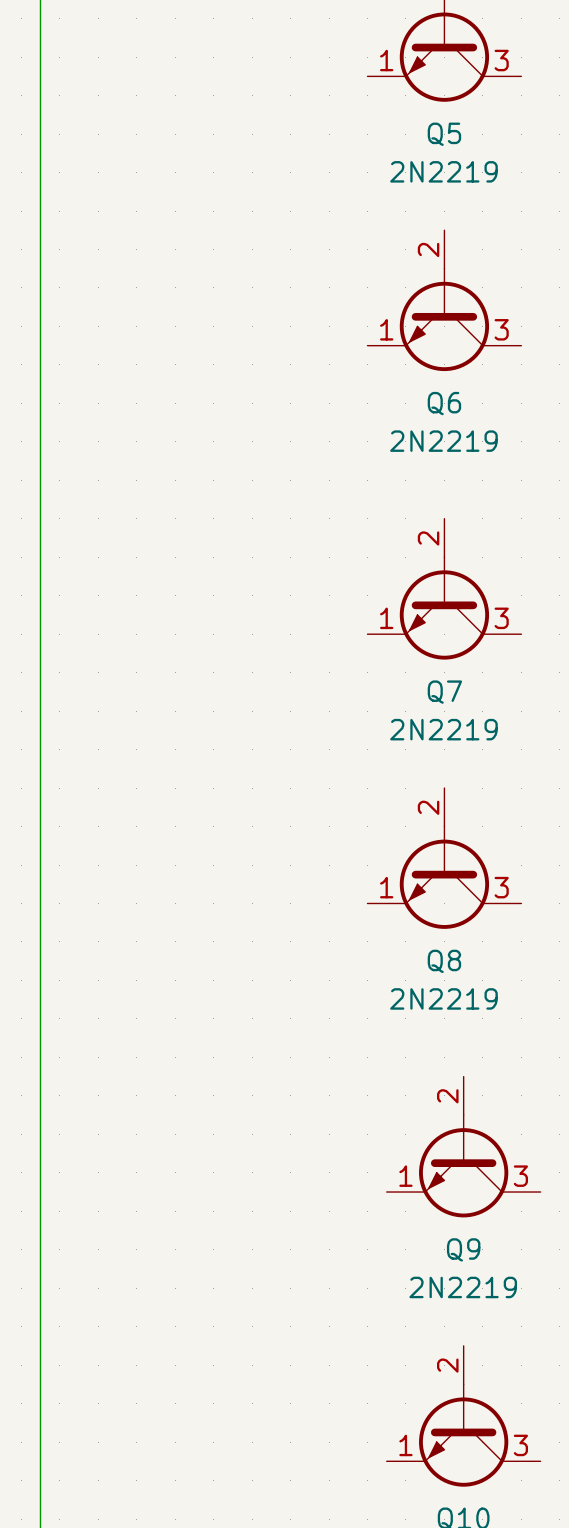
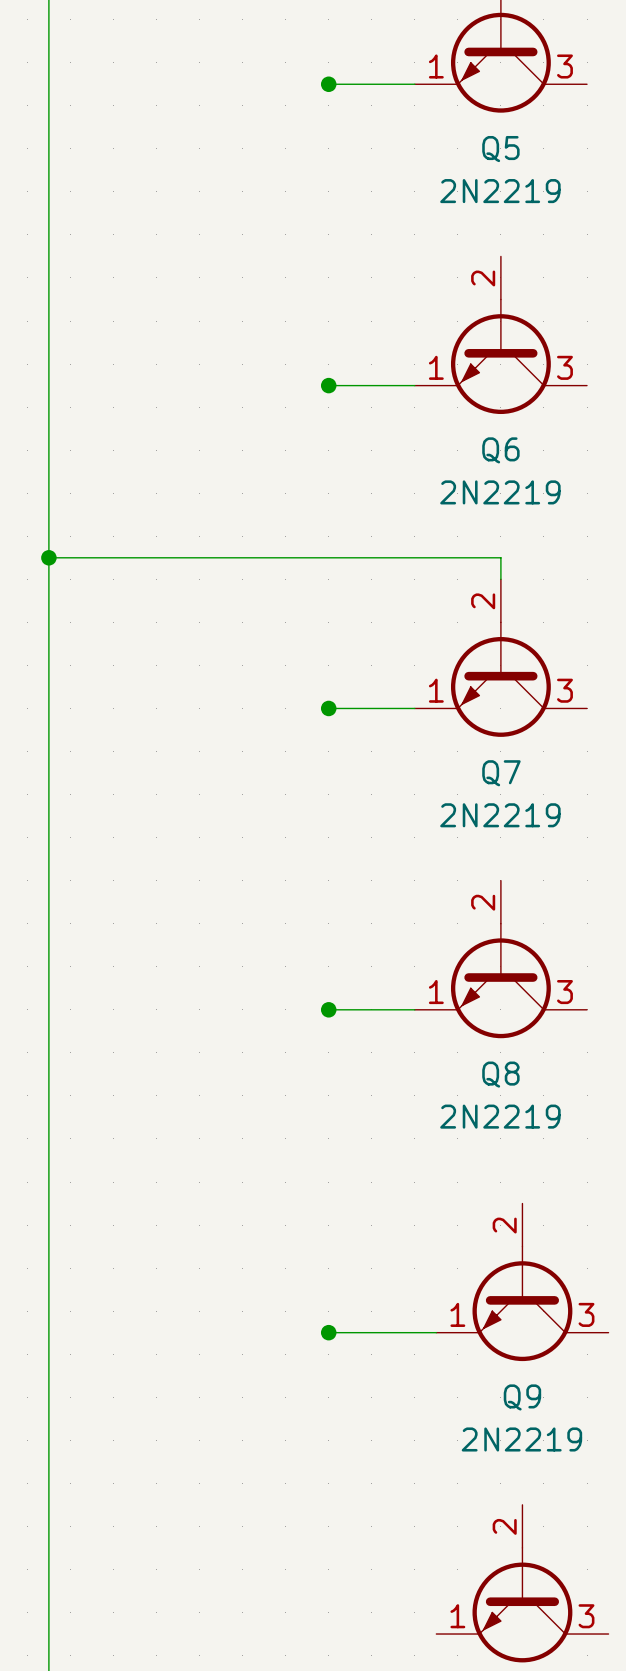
wire: none -> (328, 84) (414, 84)
junction: none -> (328, 84)
wire: none -> (328, 385) (414, 385)
junction: none -> (328, 385)
wire: none -> (48, 557) (500, 557) (500, 579)
junction: none -> (48, 557)
wire: none -> (328, 708) (414, 708)
junction: none -> (328, 708)
wire: none -> (328, 1009) (414, 1009)
junction: none -> (328, 1009)
wire: none -> (328, 1332) (436, 1332)
junction: none -> (328, 1332)

